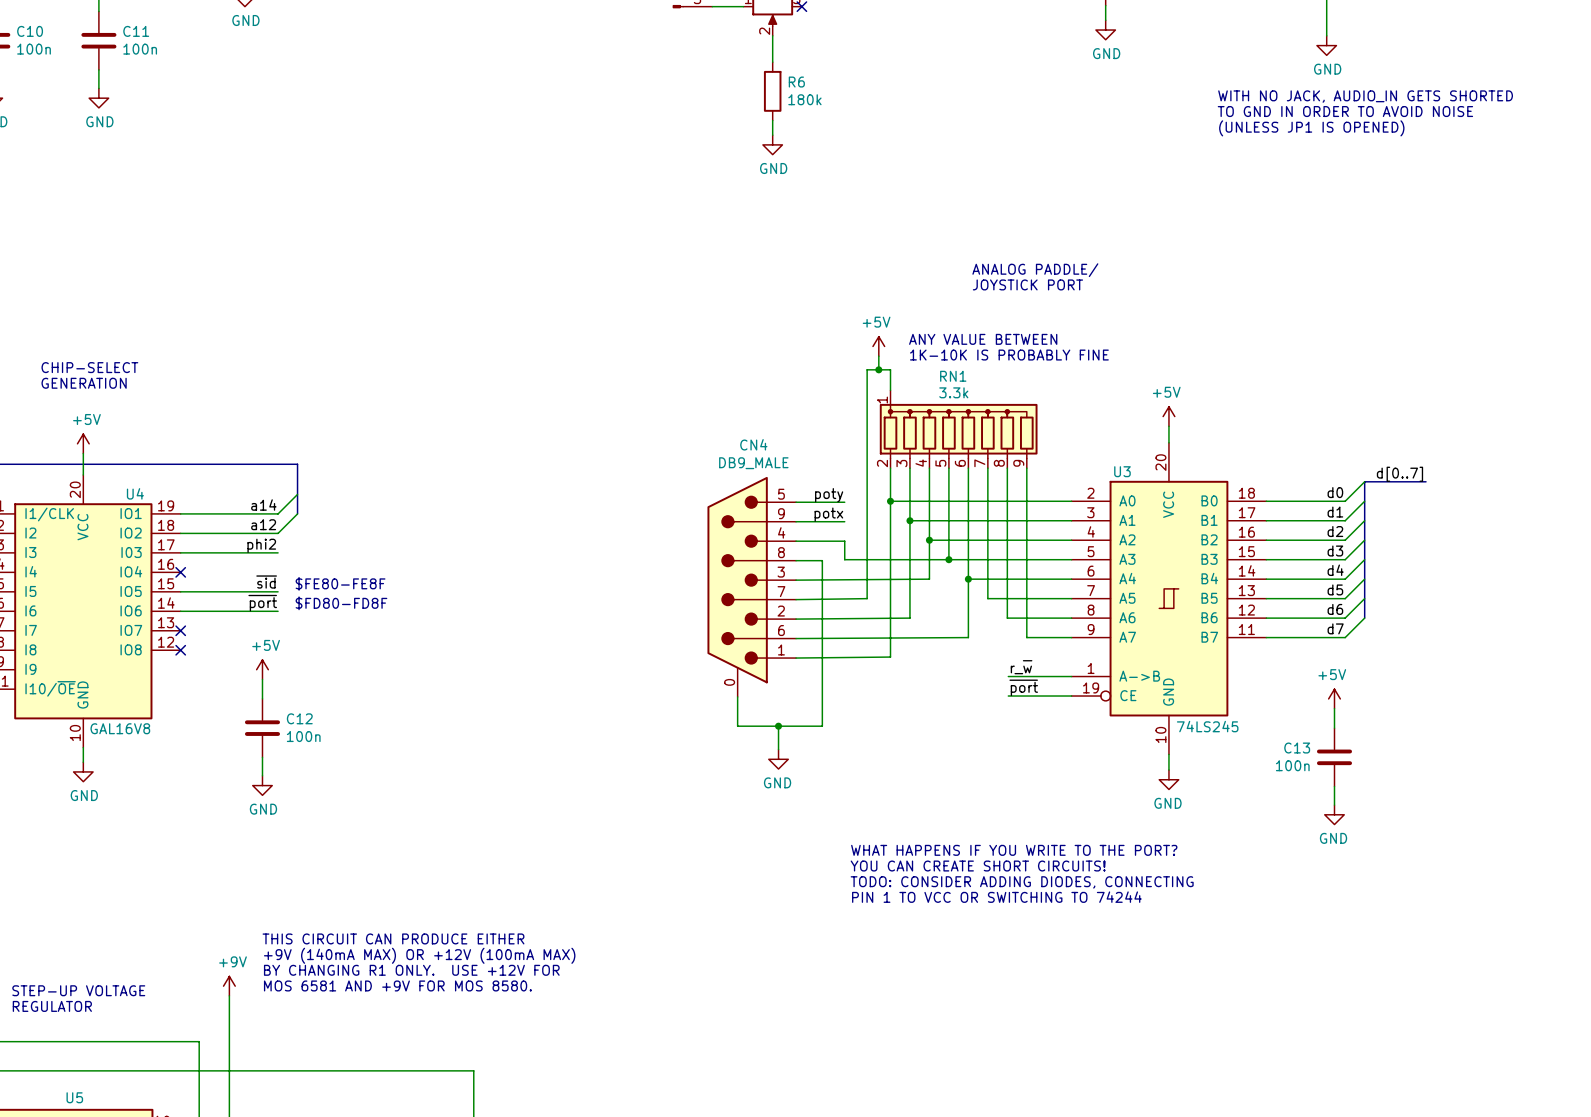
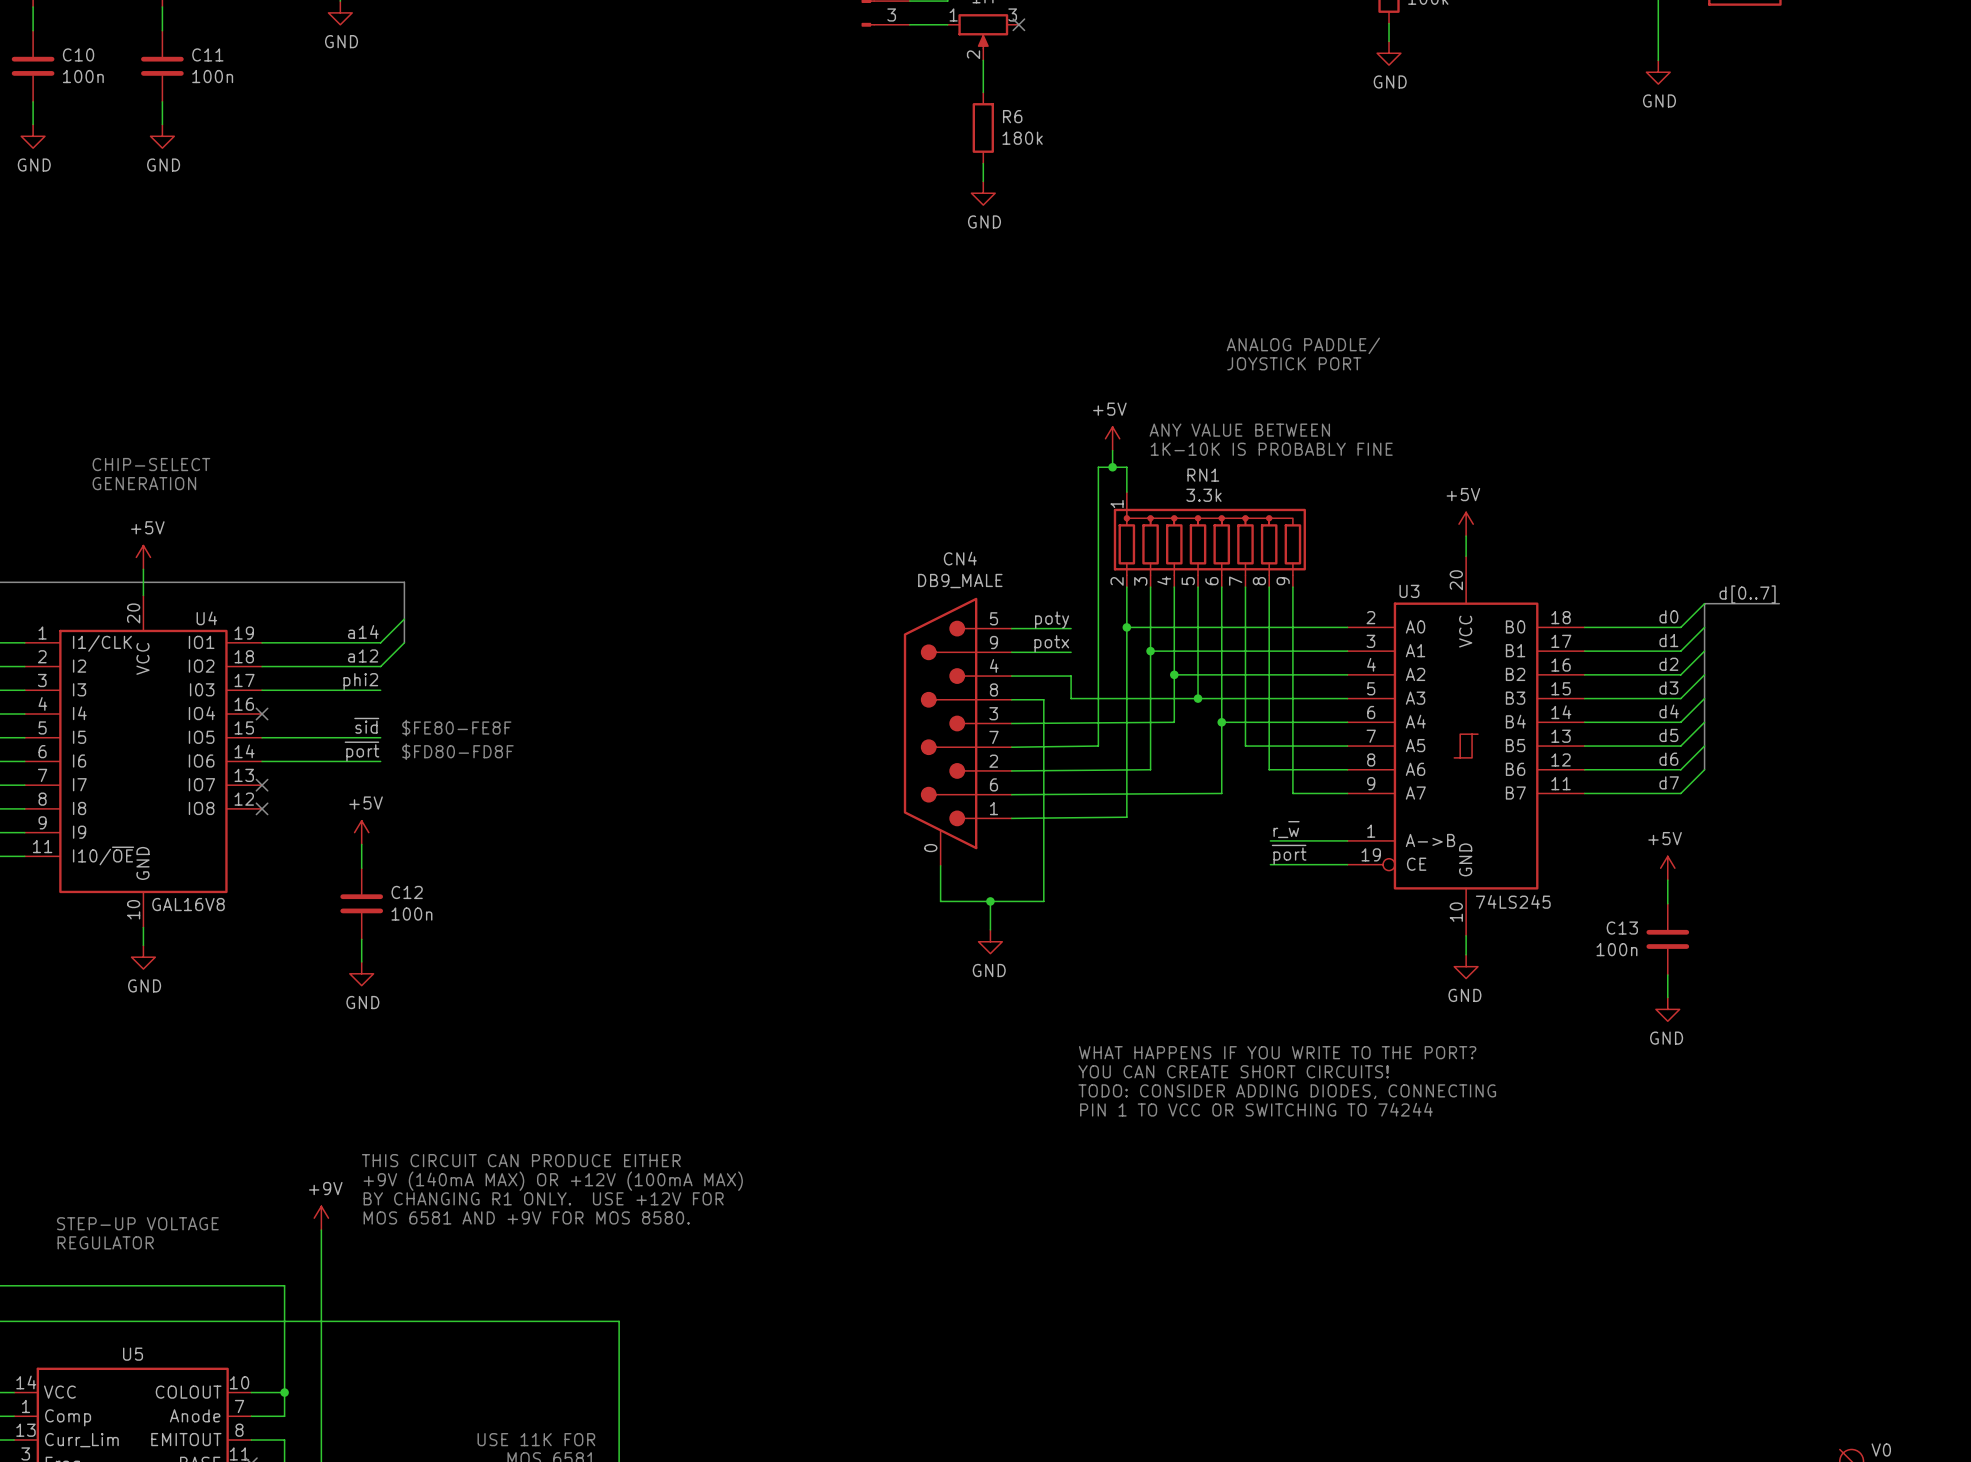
text: WITH NO JACK, AUDIO_IN GETS SHORTED (1365, 96) -> none
text: TO GND IN ORDER TO AVOID NOISE (1345, 111) -> none
text: (UNLESS JP1 IS OPENED) (1311, 128) -> none

